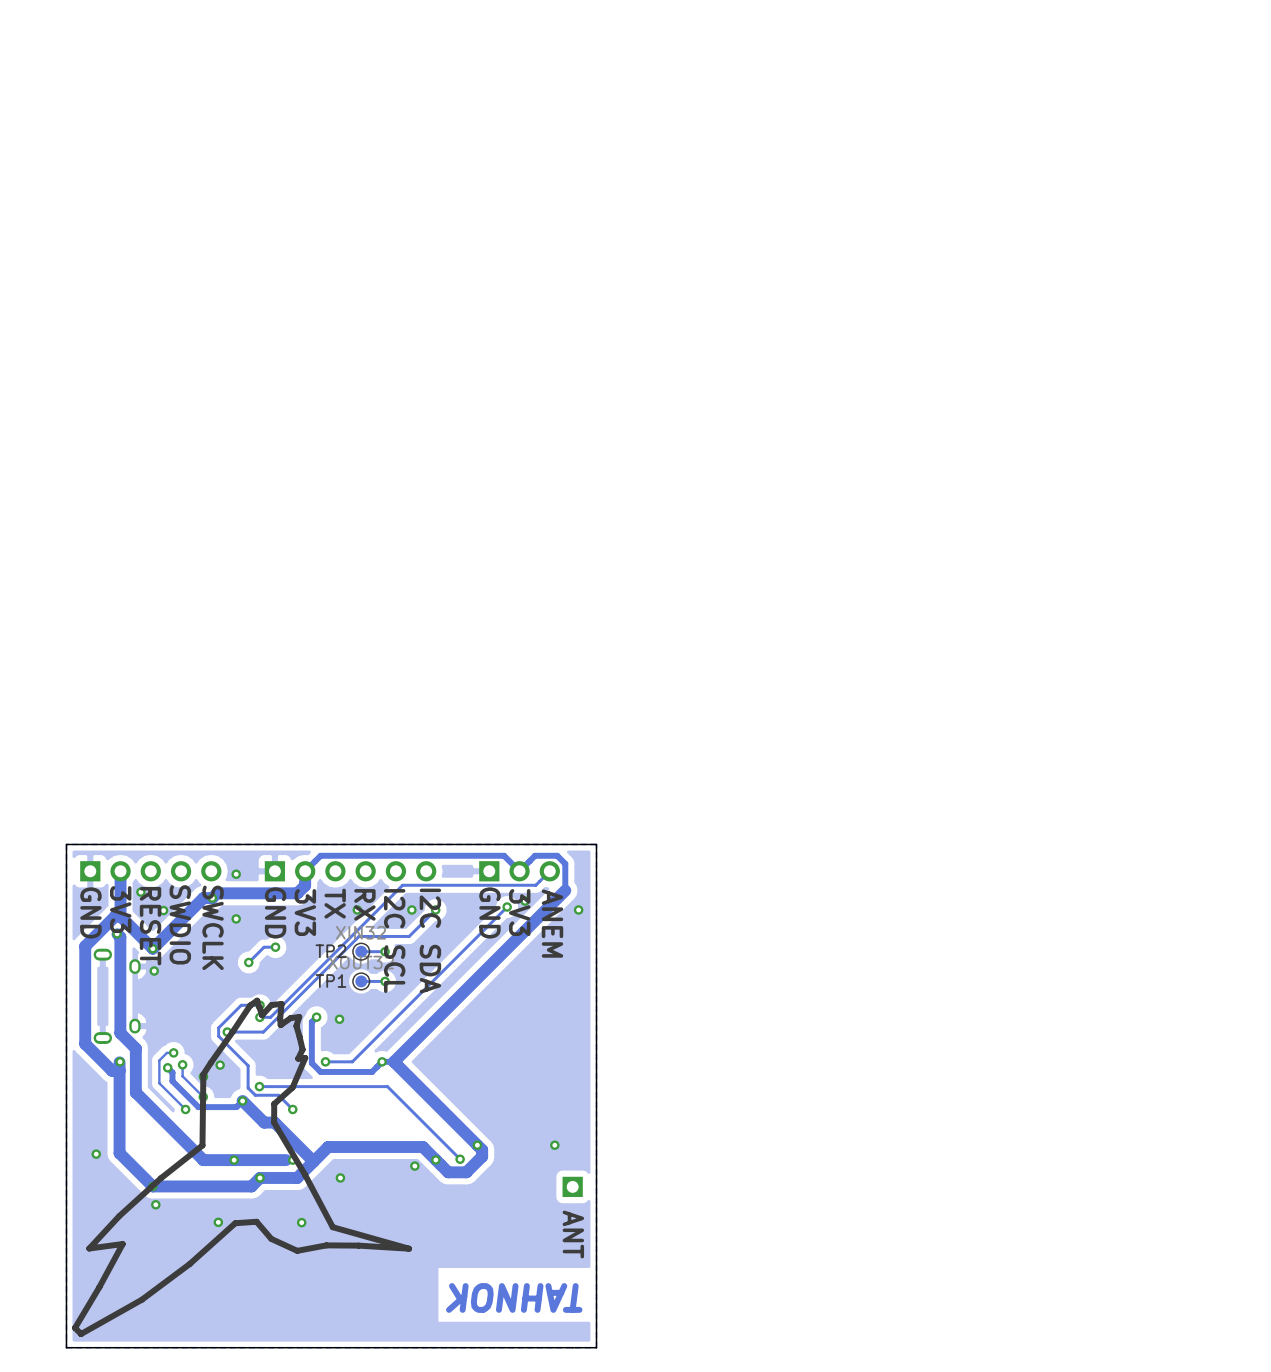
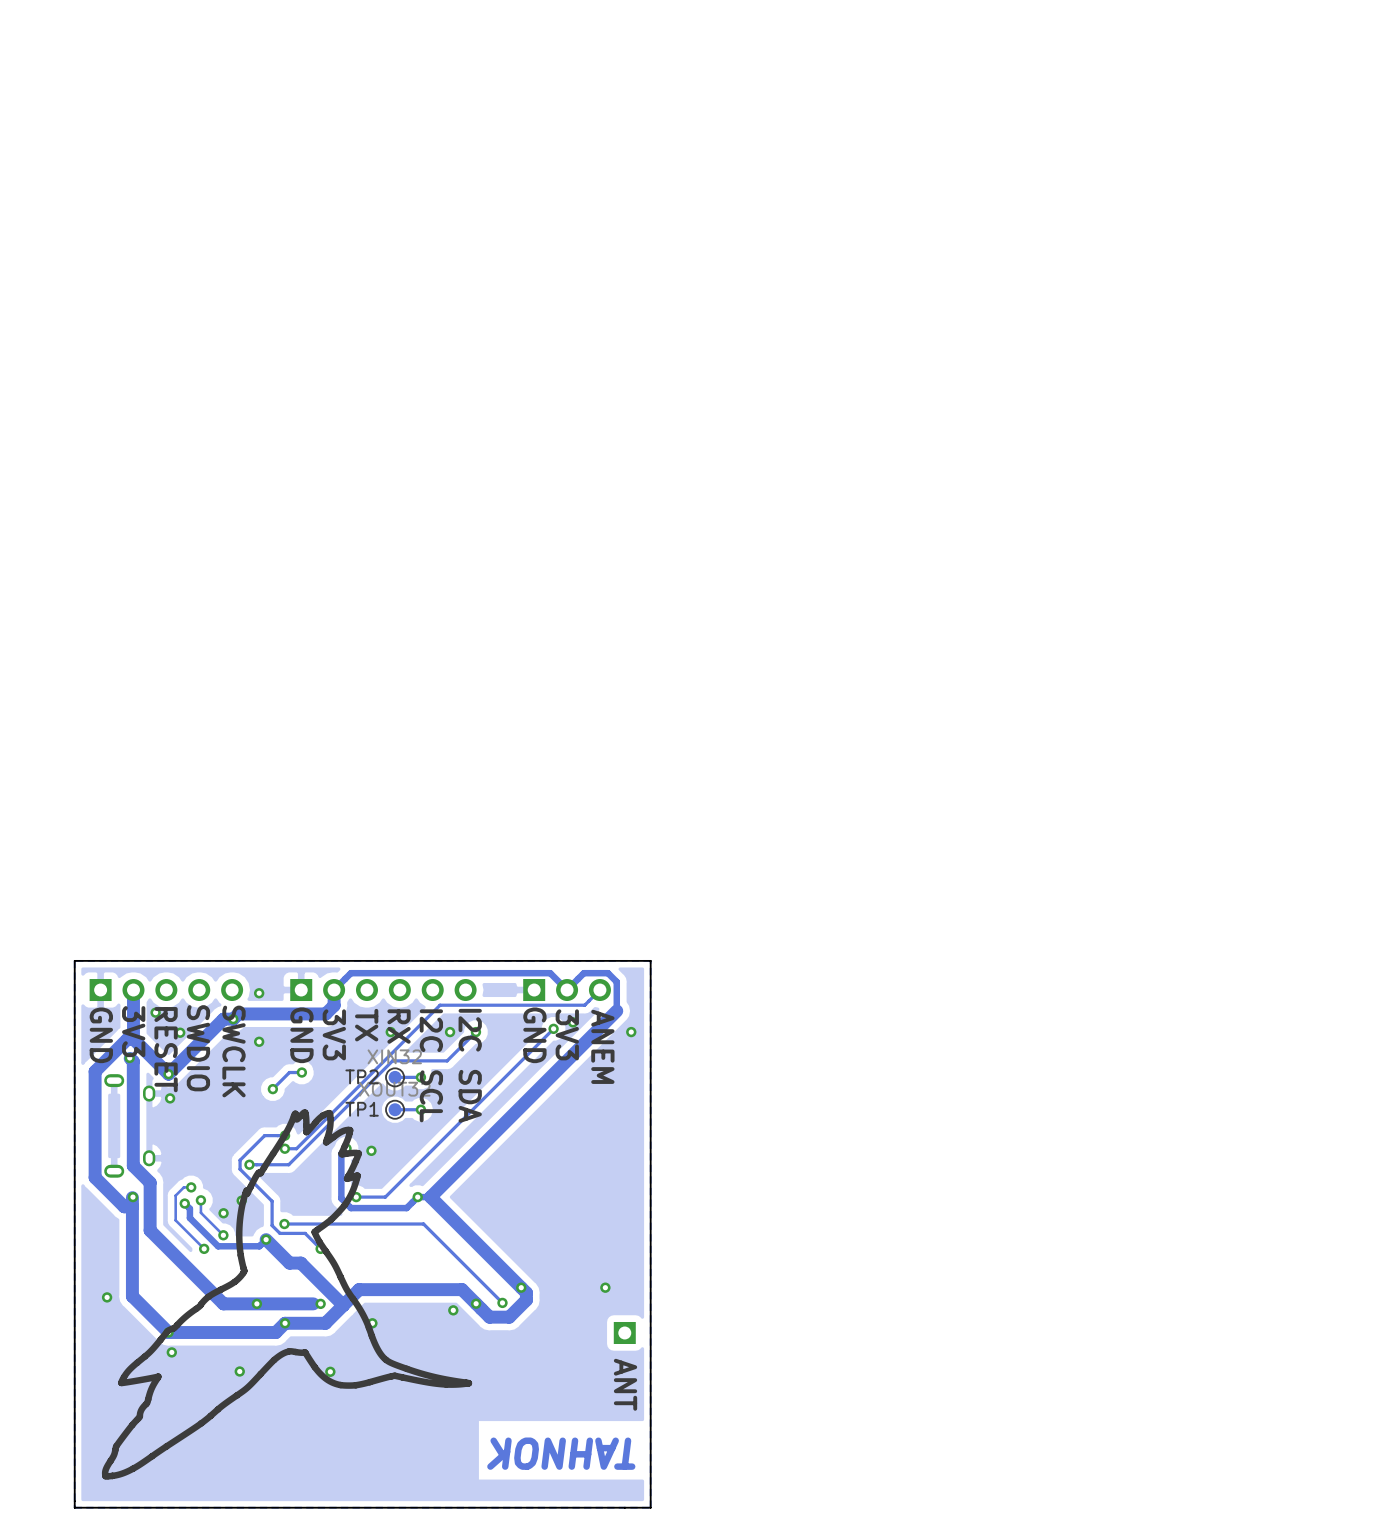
drawing: none -> [101, 1109, 473, 1480]
drawing: [72, 997, 413, 1338] -> none

